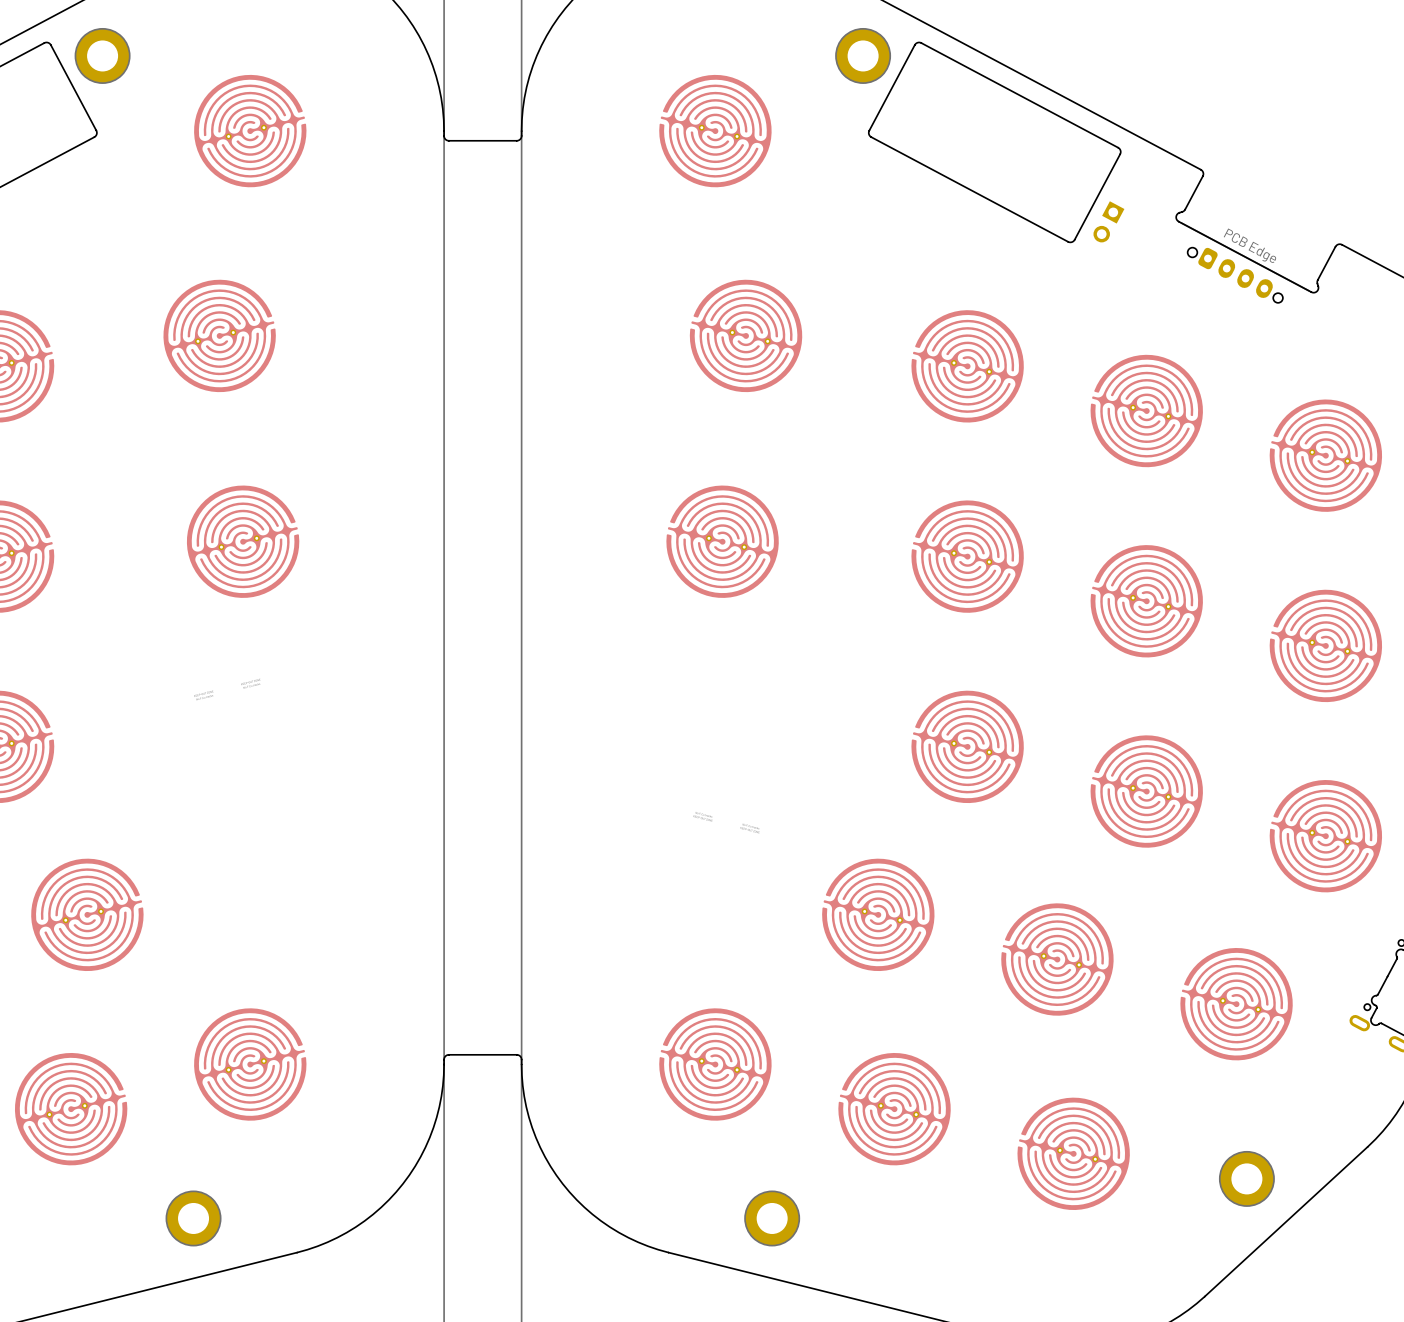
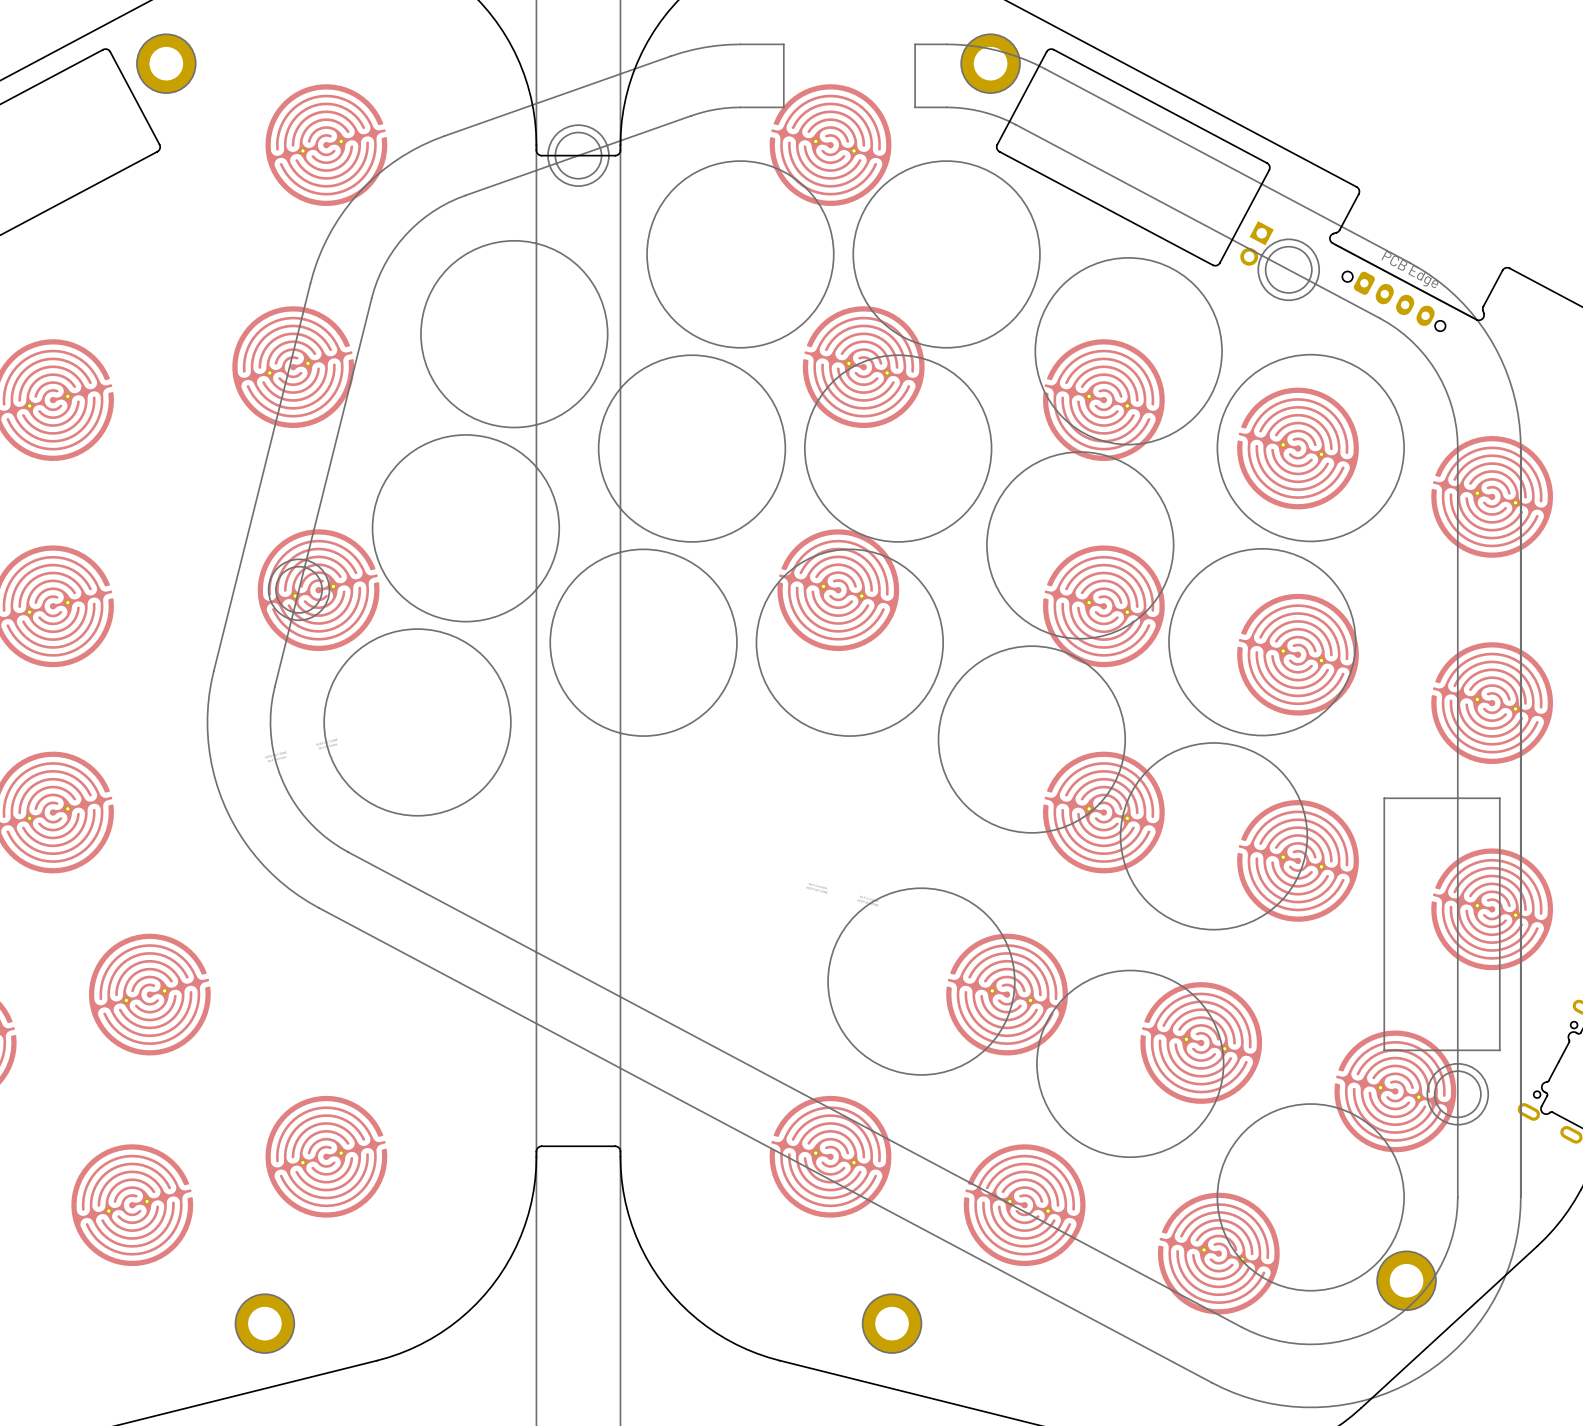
line: none -> (740, 44) (783, 44) (783, 107) (732, 107) (699, 113) (465, 195) (440, 206) (418, 222) (405, 235) (389, 256) (377, 281) (371, 298) (272, 696) (270, 725) (272, 744) (276, 763) (287, 791) (297, 807) (316, 829) (348, 852) (1250, 1331) (1289, 1342) (1329, 1343) (1368, 1332) (1386, 1323) (1410, 1305) (1430, 1282) (1445, 1256) (1452, 1237) (1457, 1207) (1457, 448) (1452, 408) (1441, 381) (1425, 356) (1404, 334) (1379, 318) (1007, 120) (990, 114) (964, 108) (915, 107) (915, 44) (956, 44) (987, 48) (1017, 56) (1045, 68) (1428, 274) (1455, 295) (1484, 330) (1501, 359) (1513, 391) (1518, 414) (1520, 448) (1519, 1221) (1508, 1268) (1487, 1311) (1473, 1330) (1448, 1356) (1408, 1383) (1363, 1400) (1316, 1407) (1268, 1403) (1222, 1388) (308, 902) (280, 881) (263, 865) (249, 847) (230, 818) (217, 786) (209, 752) (207, 717) (211, 682) (310, 283) (321, 250) (337, 220) (358, 192) (384, 169) (412, 150) (433, 140) (681, 52) (716, 45) (740, 44)
drawing: none -> [547, 124, 610, 187]
drawing: none -> [267, 160, 1405, 931]
drawing: none -> [1257, 238, 1320, 302]
line: none -> (1384, 798) (1384, 1050) (1499, 1050) (1499, 798) (1384, 798)
drawing: none -> [827, 887, 1016, 1076]
drawing: none -> [1036, 969, 1405, 1292]
drawing: none -> [1426, 1063, 1490, 1126]

